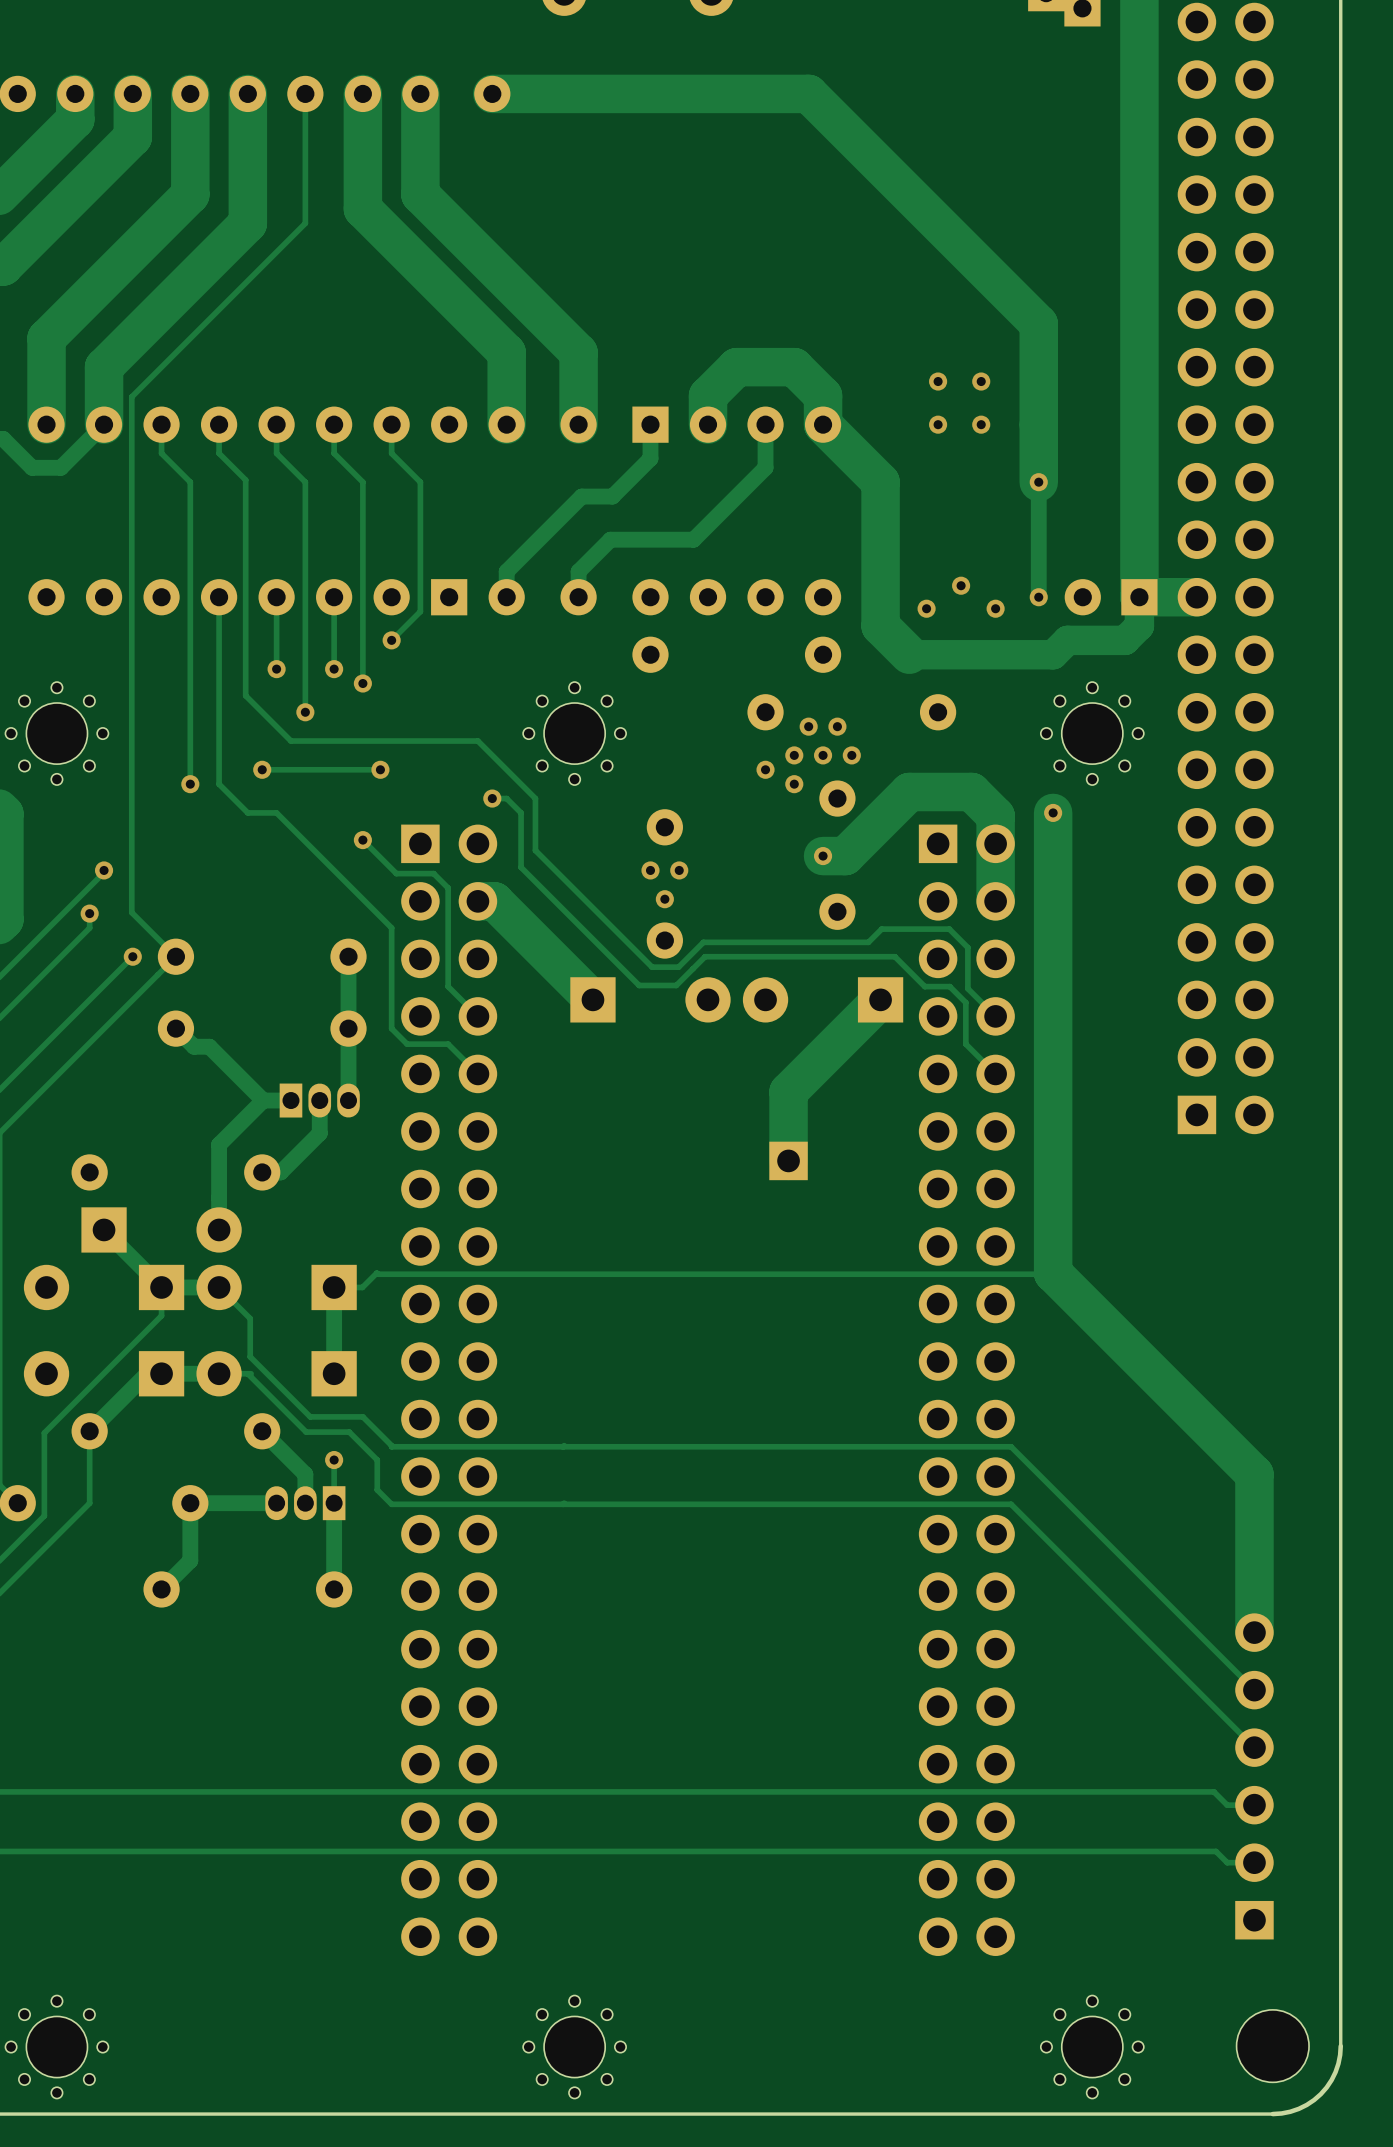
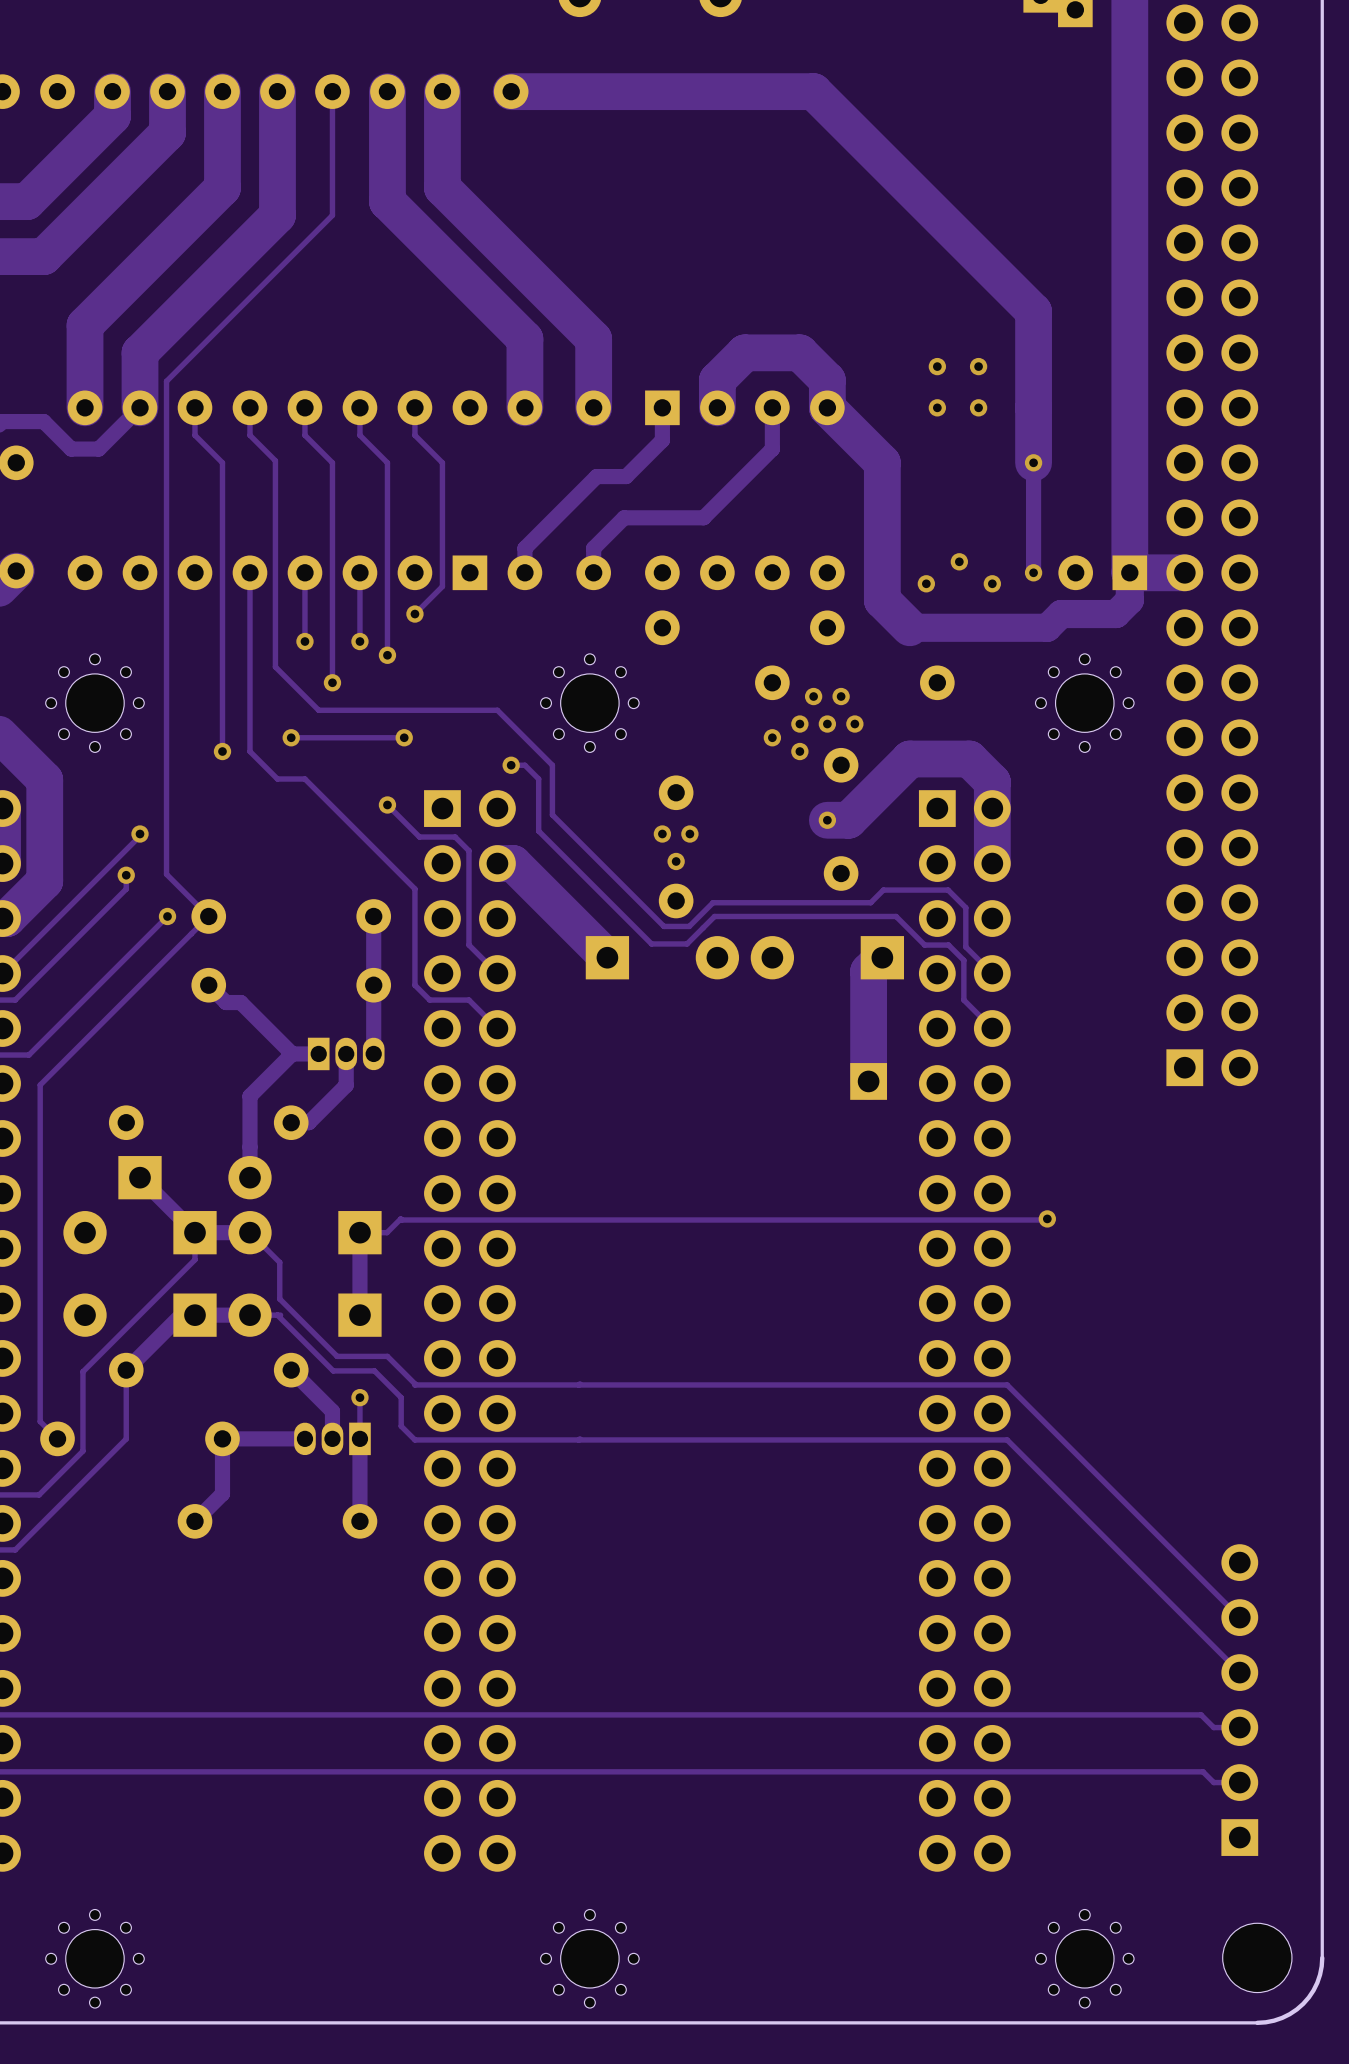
track: (1053, 812) (1053, 1273) (1254, 1474) (1254, 1632) -> none
via: (1053, 812) -> none
track: (866, 1014) (788, 1091) (788, 1160) -> (868, 971) (868, 1081)
part position: (788, 1160) -> (868, 1081)
via: none -> (1047, 1218)

